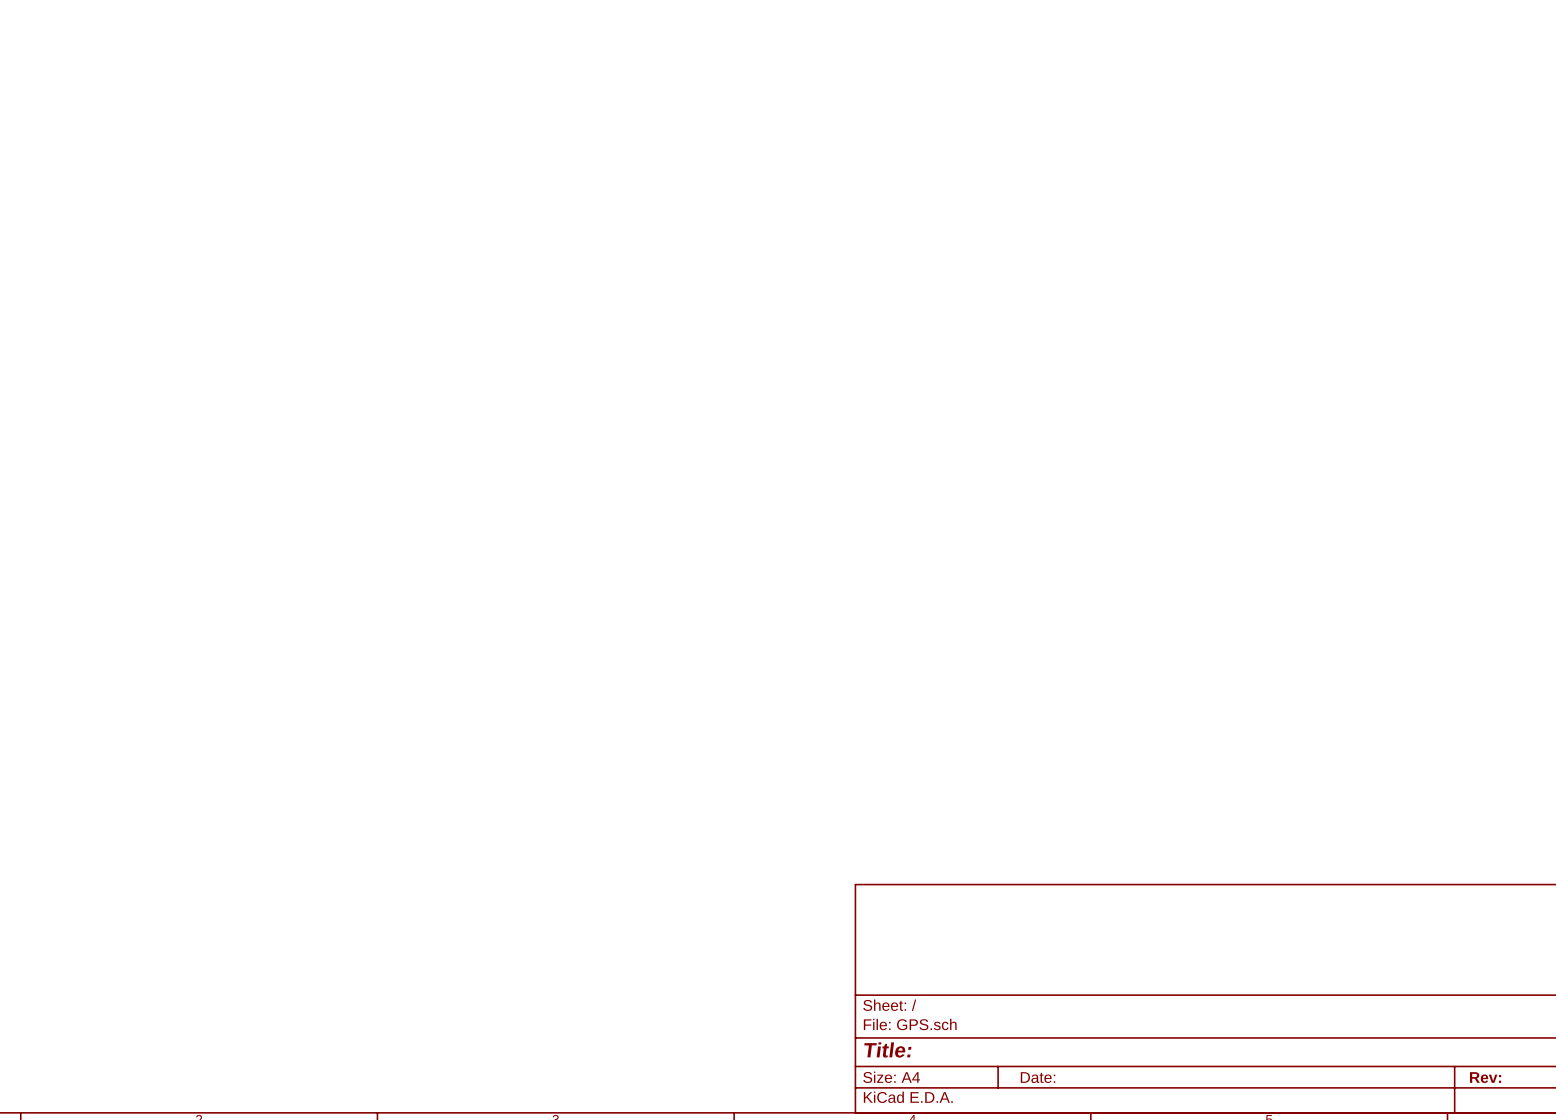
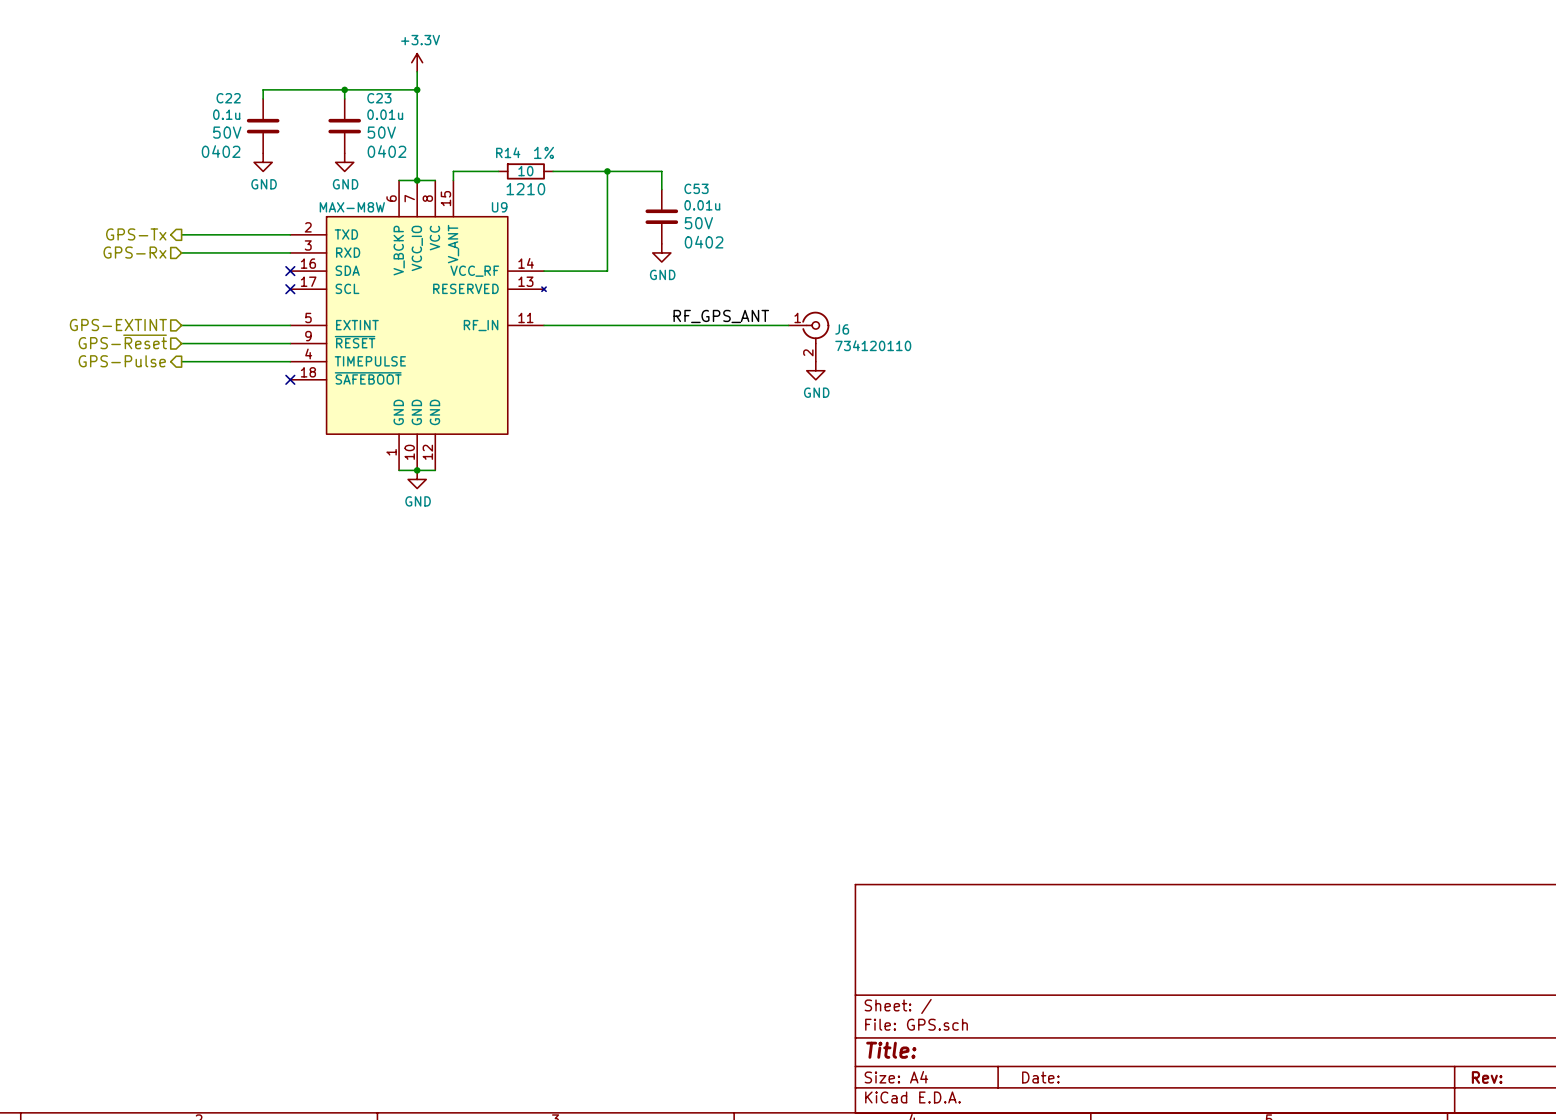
power symbol: none -> +3.3V (417, 62)
wire: none -> (417, 71) (417, 180)
wire: none -> (344, 89) (344, 98)
junction: none -> (344, 89)
wire: none -> (417, 89) (263, 89) (263, 98)
junction: none -> (417, 89)
C22: none -> 0.1u (263, 126)
C23: none -> 0.01u (344, 126)
power symbol: none -> GND (263, 162)
power symbol: none -> GND (344, 162)
wire: none -> (498, 171) (453, 171) (453, 180)
R14: none -> 10 (525, 171)
wire: none -> (553, 171) (661, 171) (661, 189)
wire: none -> (607, 171) (607, 271) (544, 271)
junction: none -> (607, 171)
wire: none -> (399, 180) (435, 180)
junction: none -> (417, 180)
C53: none -> 0.01u (661, 216)
hierarchical label: none -> GPS-Tx (136, 234)
wire: none -> (181, 234) (290, 234)
hierarchical label: none -> GPS-Rx (134, 252)
wire: none -> (181, 252) (290, 252)
power symbol: none -> GND (661, 252)
no-connect mark: none -> (290, 271)
no-connect mark: none -> (290, 289)
label: none -> RF_GPS_ANT (721, 316)
hierarchical label: none -> GPS-EXTINT (118, 325)
wire: none -> (181, 325) (290, 325)
U9: none -> MAX-M8W (418, 325)
wire: none -> (544, 325) (788, 325)
J6: none -> 734120110 (809, 336)
hierarchical label: none -> GPS-~{Reset} (122, 341)
wire: none -> (181, 343) (290, 343)
hierarchical label: none -> GPS-Pulse (122, 361)
wire: none -> (181, 361) (290, 361)
power symbol: none -> GND (815, 370)
no-connect mark: none -> (290, 379)
wire: none -> (399, 470) (435, 470)
junction: none -> (417, 470)
power symbol: none -> GND (417, 479)

